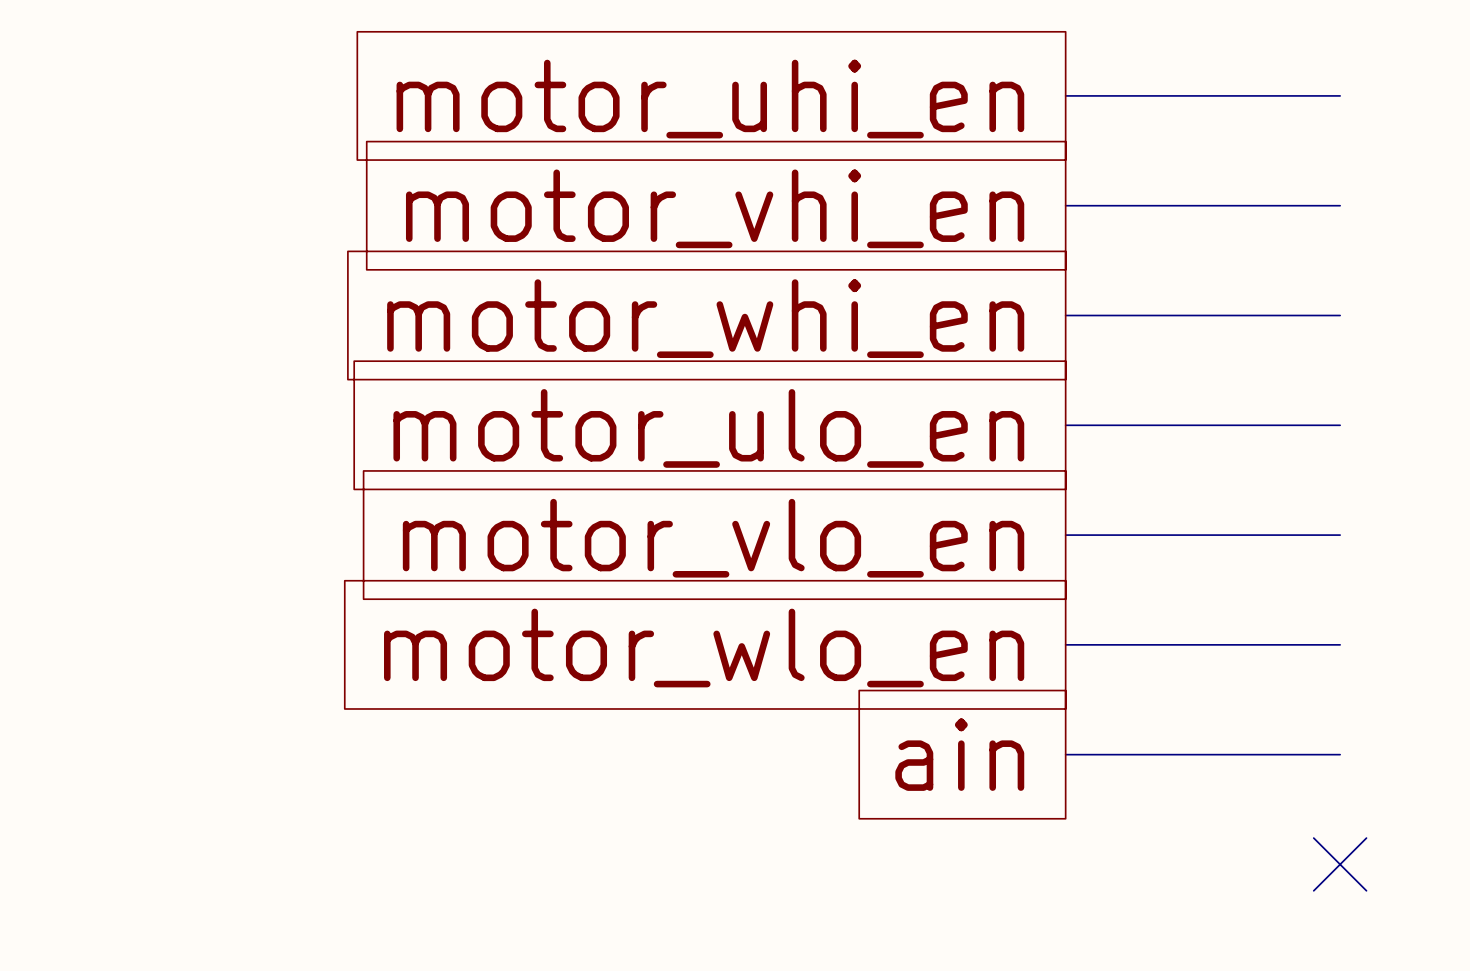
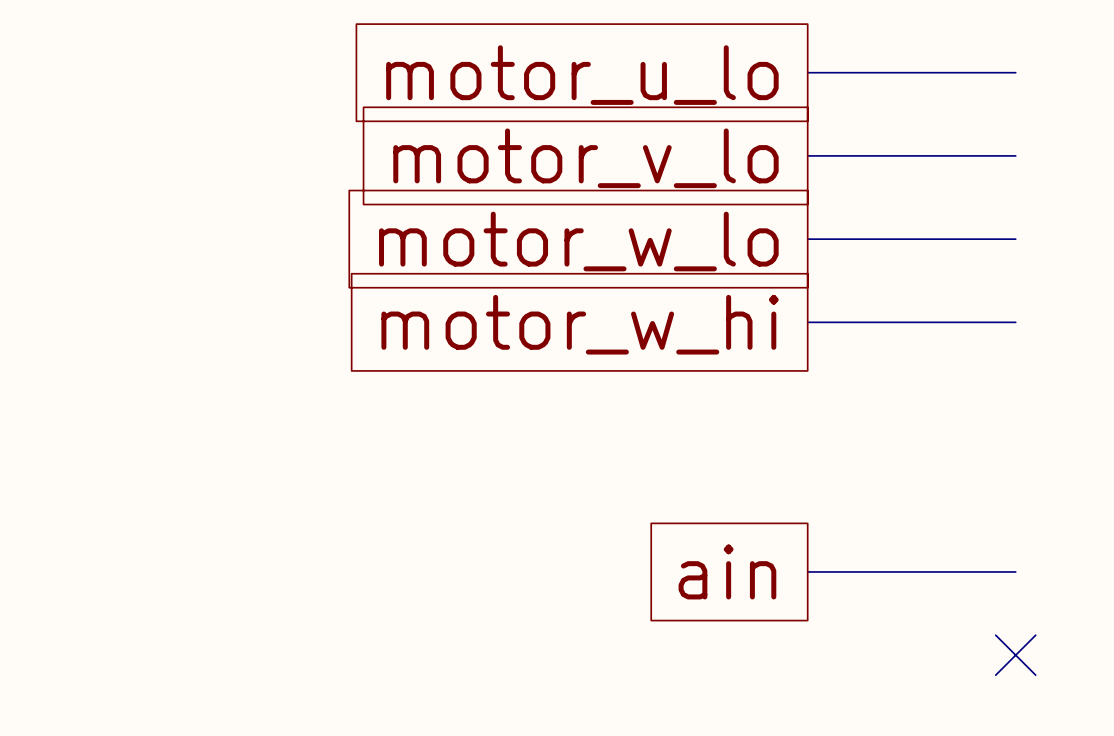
global label: motor_uhi_en (710, 99) -> motor_u_lo (582, 75)
global label: motor_vhi_en (715, 208) -> motor_v_lo (585, 158)
global label: motor_whi_en (705, 318) -> motor_w_lo (578, 241)
global label: motor_ulo_en (708, 428) -> motor_w_hi (580, 324)
wire: (1065, 535) (1340, 535) -> none
global label: motor_vlo_en (713, 538) -> none
wire: (1065, 644) (1340, 644) -> none
global label: motor_wlo_en (704, 648) -> none

